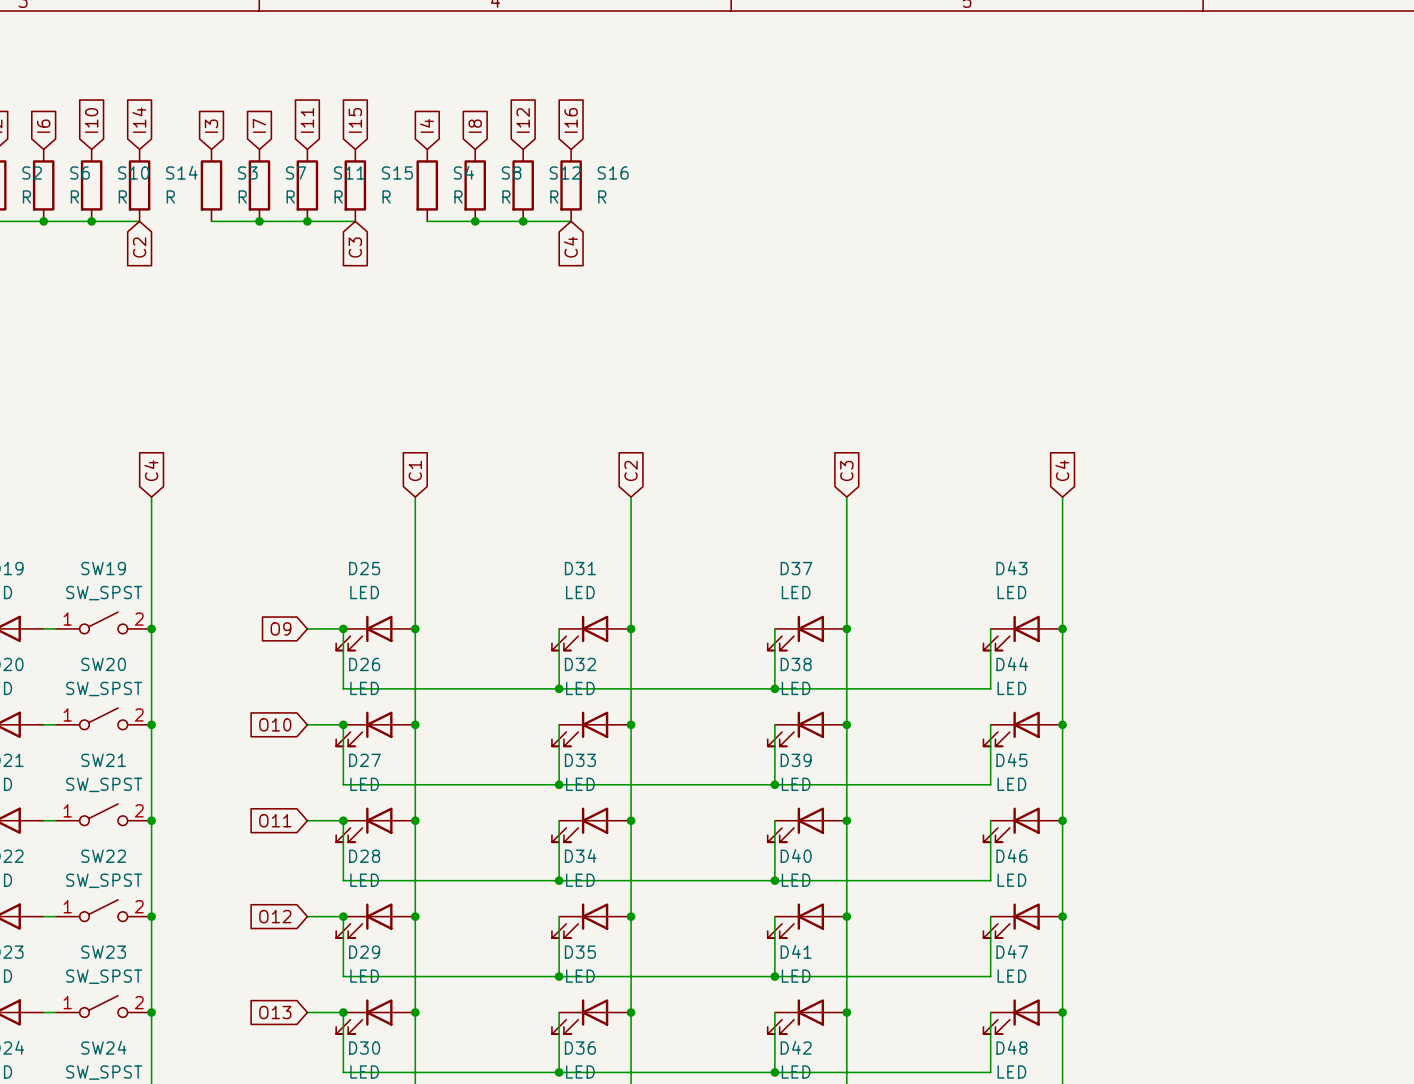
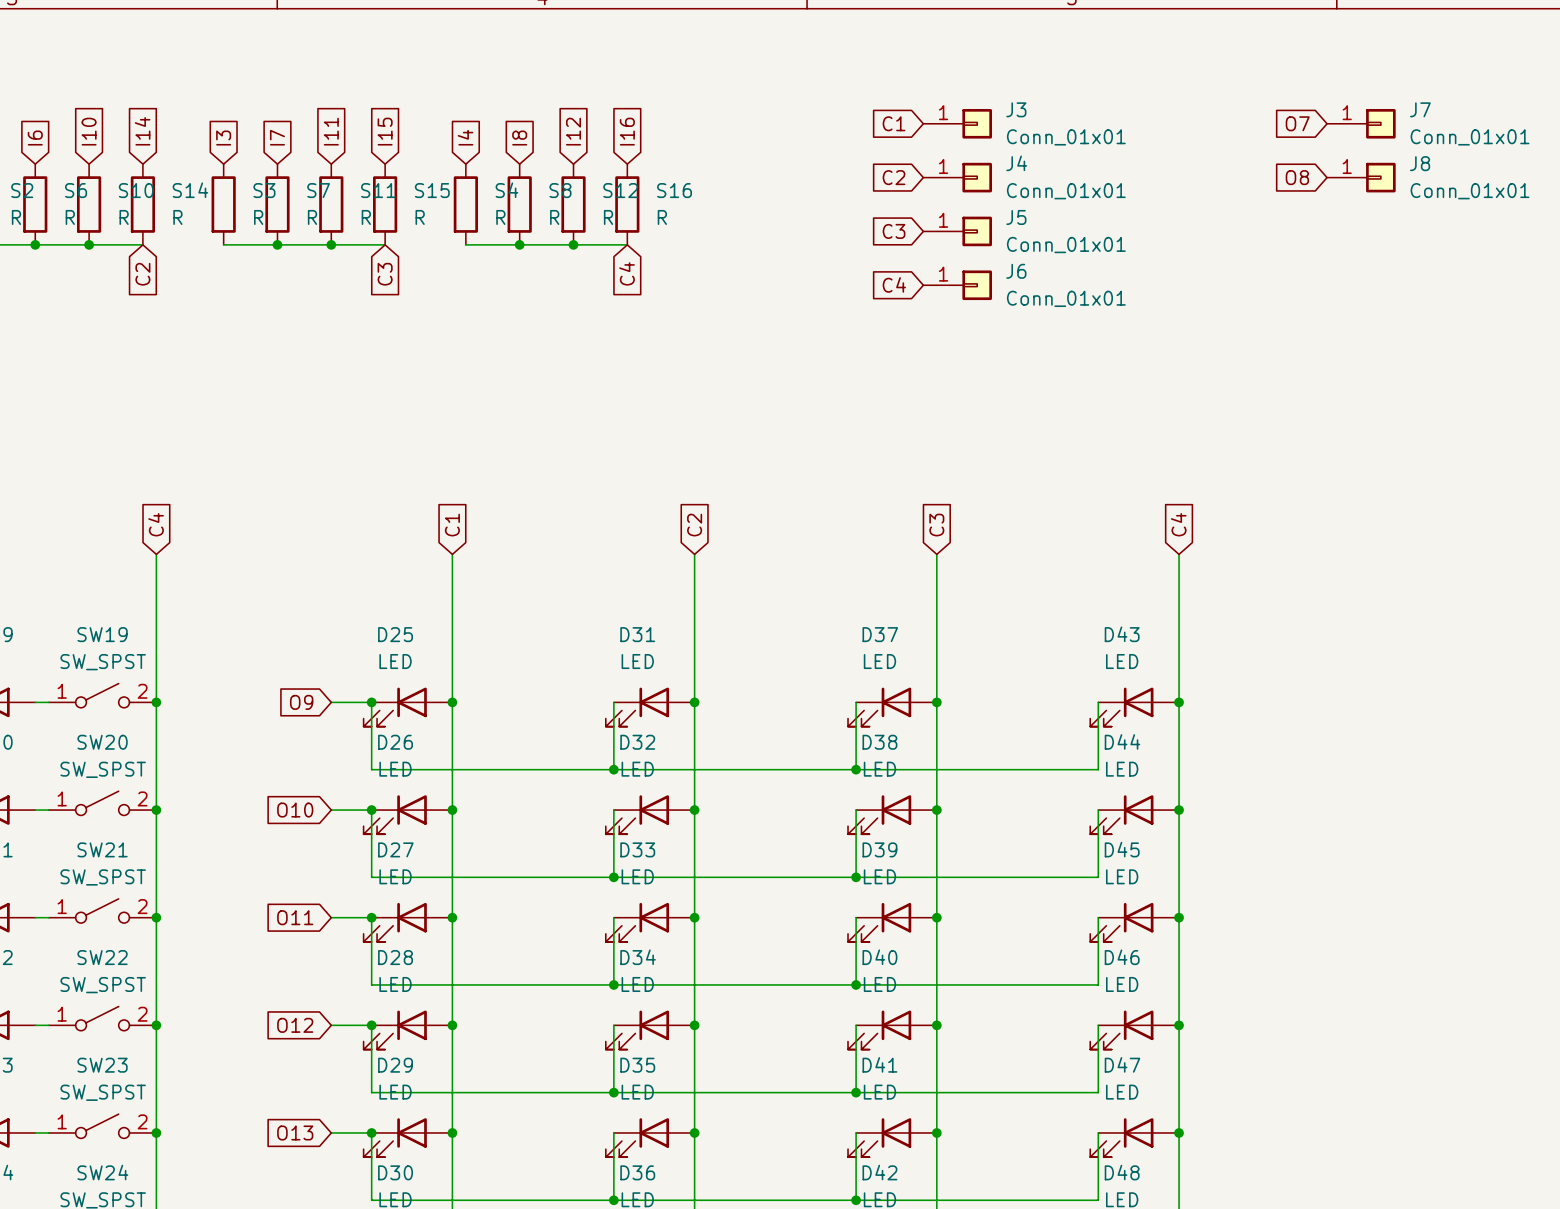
global label: none -> C1 (894, 123)
J3: none -> Conn_01x01 (957, 123)
global label: none -> O7 (1297, 123)
J7: none -> Conn_01x01 (1361, 123)
global label: none -> C2 (894, 177)
J4: none -> Conn_01x01 (957, 177)
global label: none -> O8 (1297, 177)
J8: none -> Conn_01x01 (1361, 177)
global label: none -> C3 (894, 231)
J5: none -> Conn_01x01 (957, 231)
global label: none -> C4 (894, 284)
J6: none -> Conn_01x01 (957, 285)

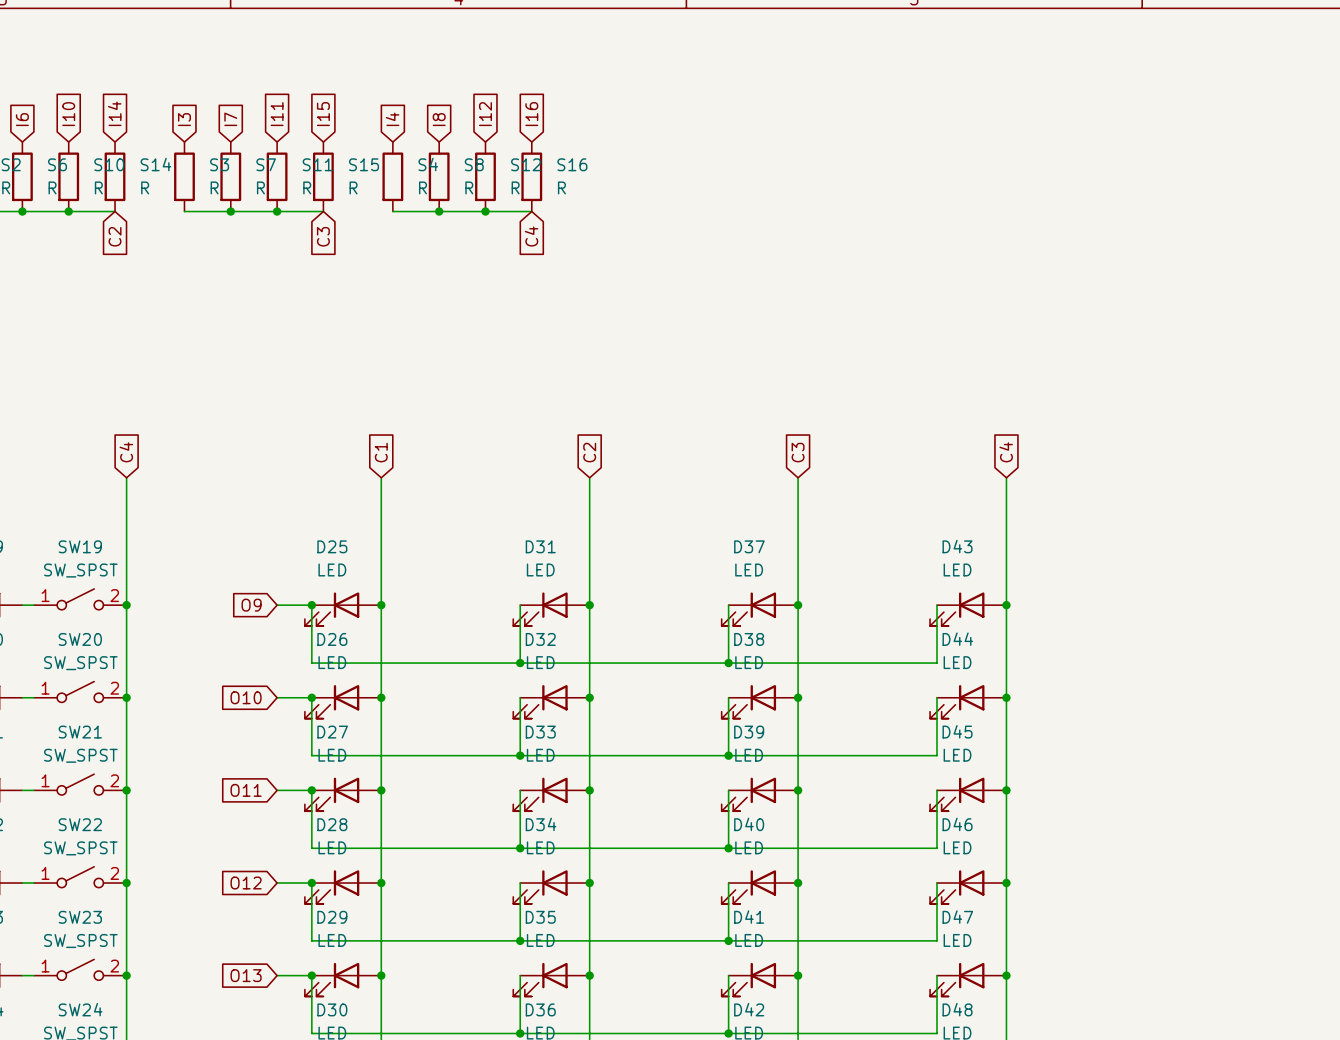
global label: C1 (894, 123) -> none
J3: Conn_01x01 (957, 123) -> none
global label: O7 (1297, 123) -> none
J7: Conn_01x01 (1361, 123) -> none
global label: C2 (894, 177) -> none
J4: Conn_01x01 (957, 177) -> none
global label: O8 (1297, 177) -> none
J8: Conn_01x01 (1361, 177) -> none
global label: C3 (894, 231) -> none
J5: Conn_01x01 (957, 231) -> none
global label: C4 (894, 284) -> none
J6: Conn_01x01 (957, 285) -> none

